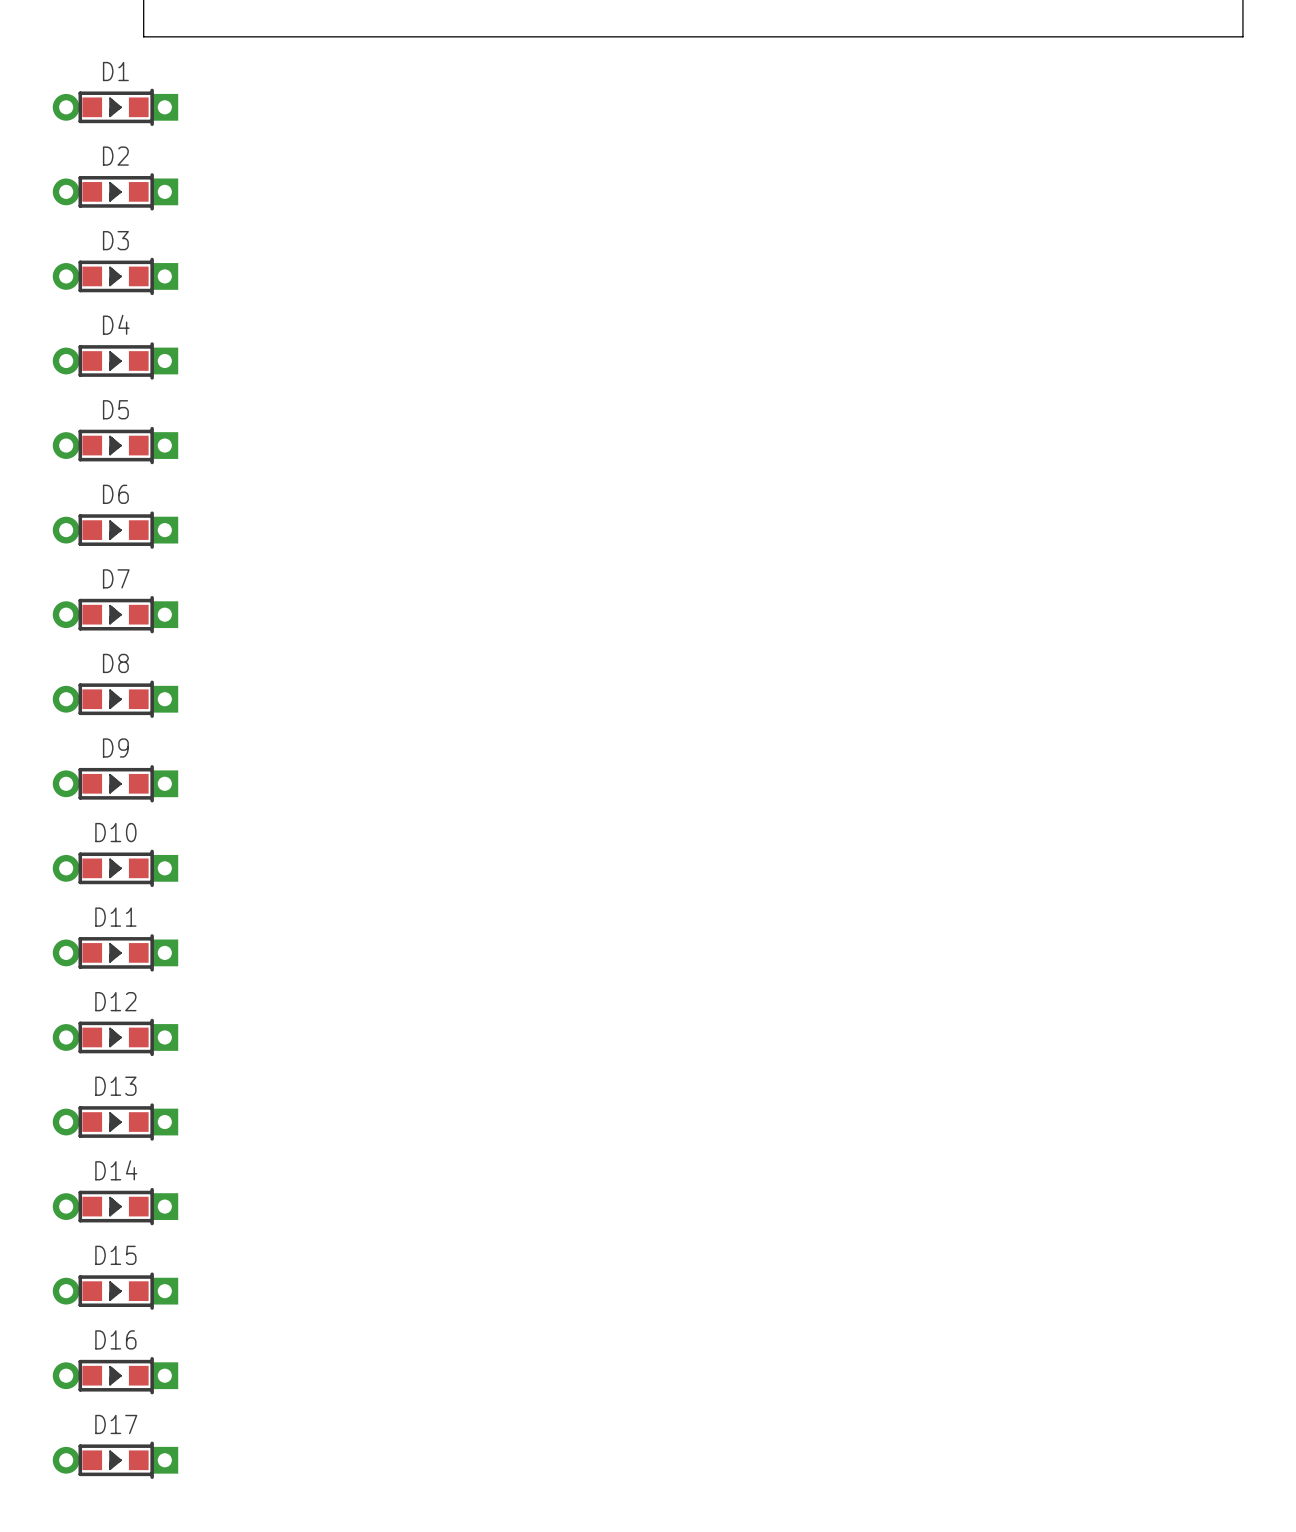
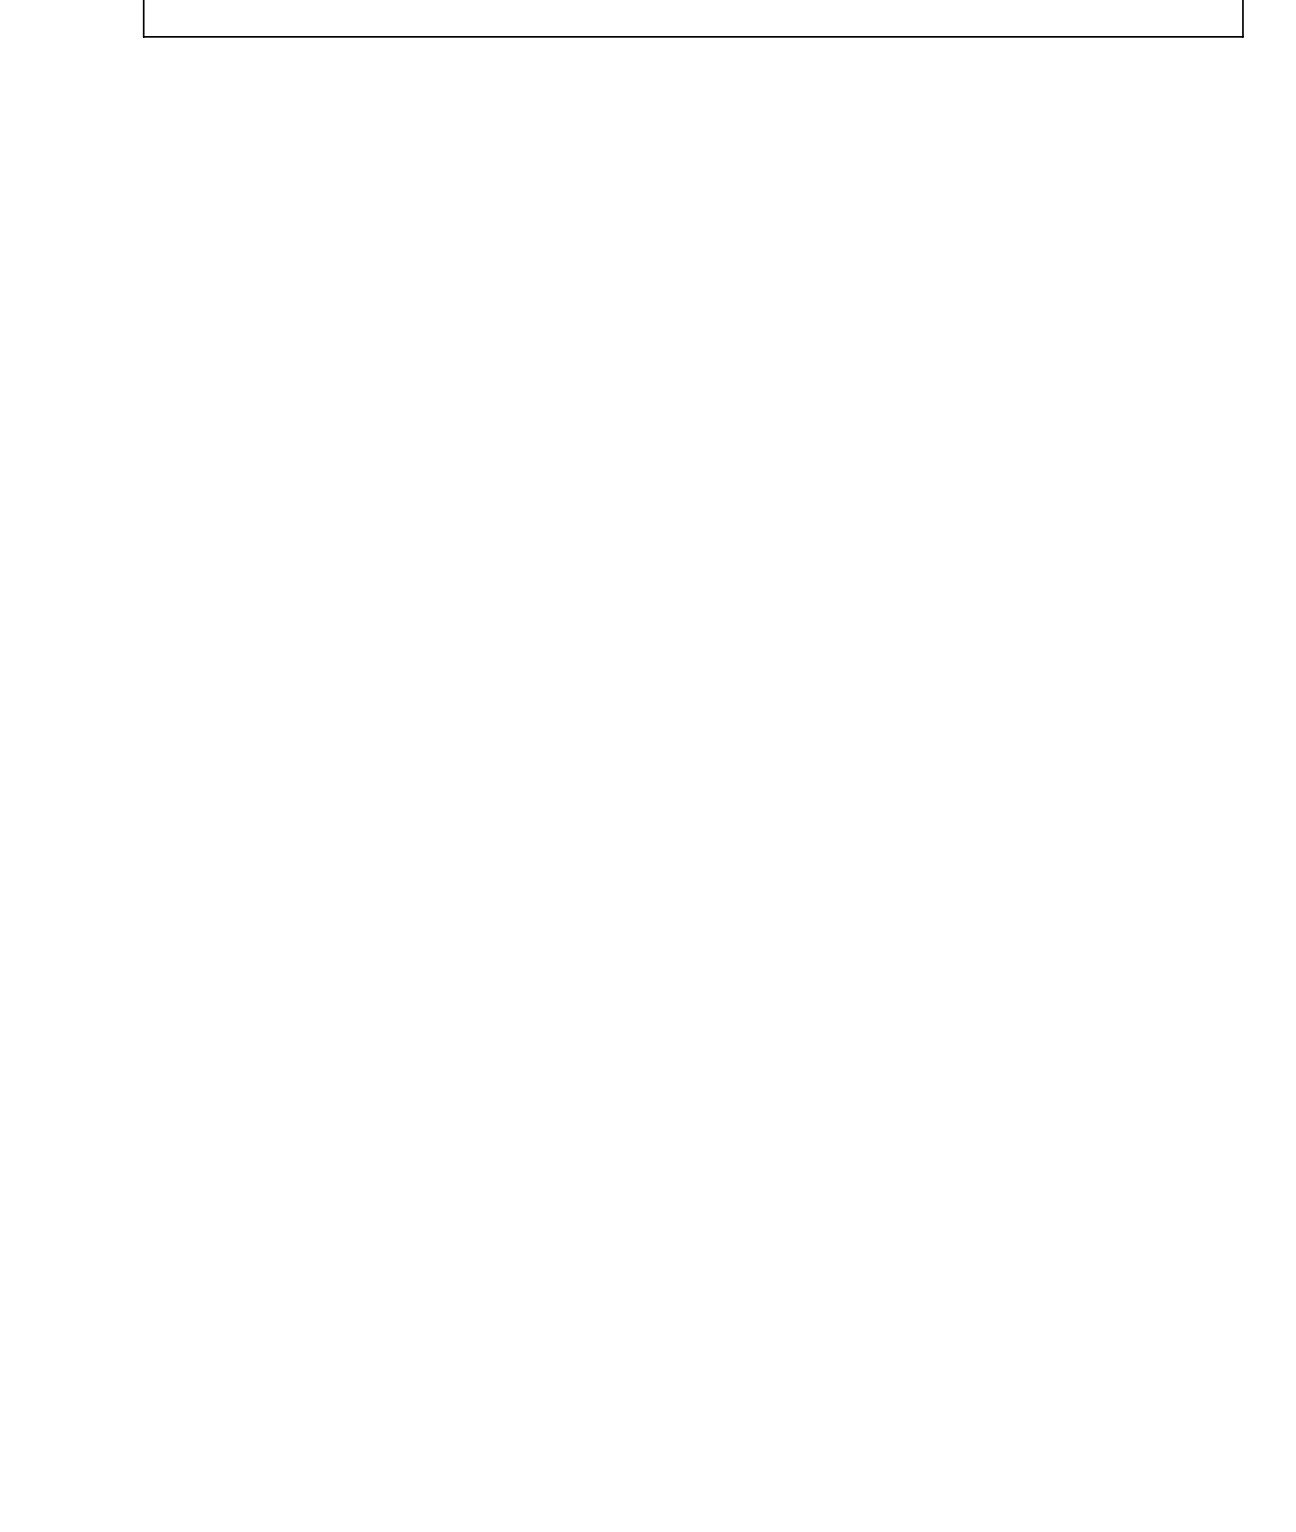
D1: (115, 107) -> none
D2: (115, 191) -> none
D3: (115, 276) -> none
D4: (115, 360) -> none
D5: (115, 445) -> none
D6: (115, 530) -> none
D7: (115, 614) -> none
D8: (115, 699) -> none
D9: (115, 783) -> none
D10: (115, 868) -> none
D11: (115, 952) -> none
D12: (115, 1037) -> none
D13: (115, 1122) -> none
D14: (115, 1206) -> none
D15: (115, 1291) -> none
D16: (115, 1375) -> none
D17: (115, 1460) -> none

